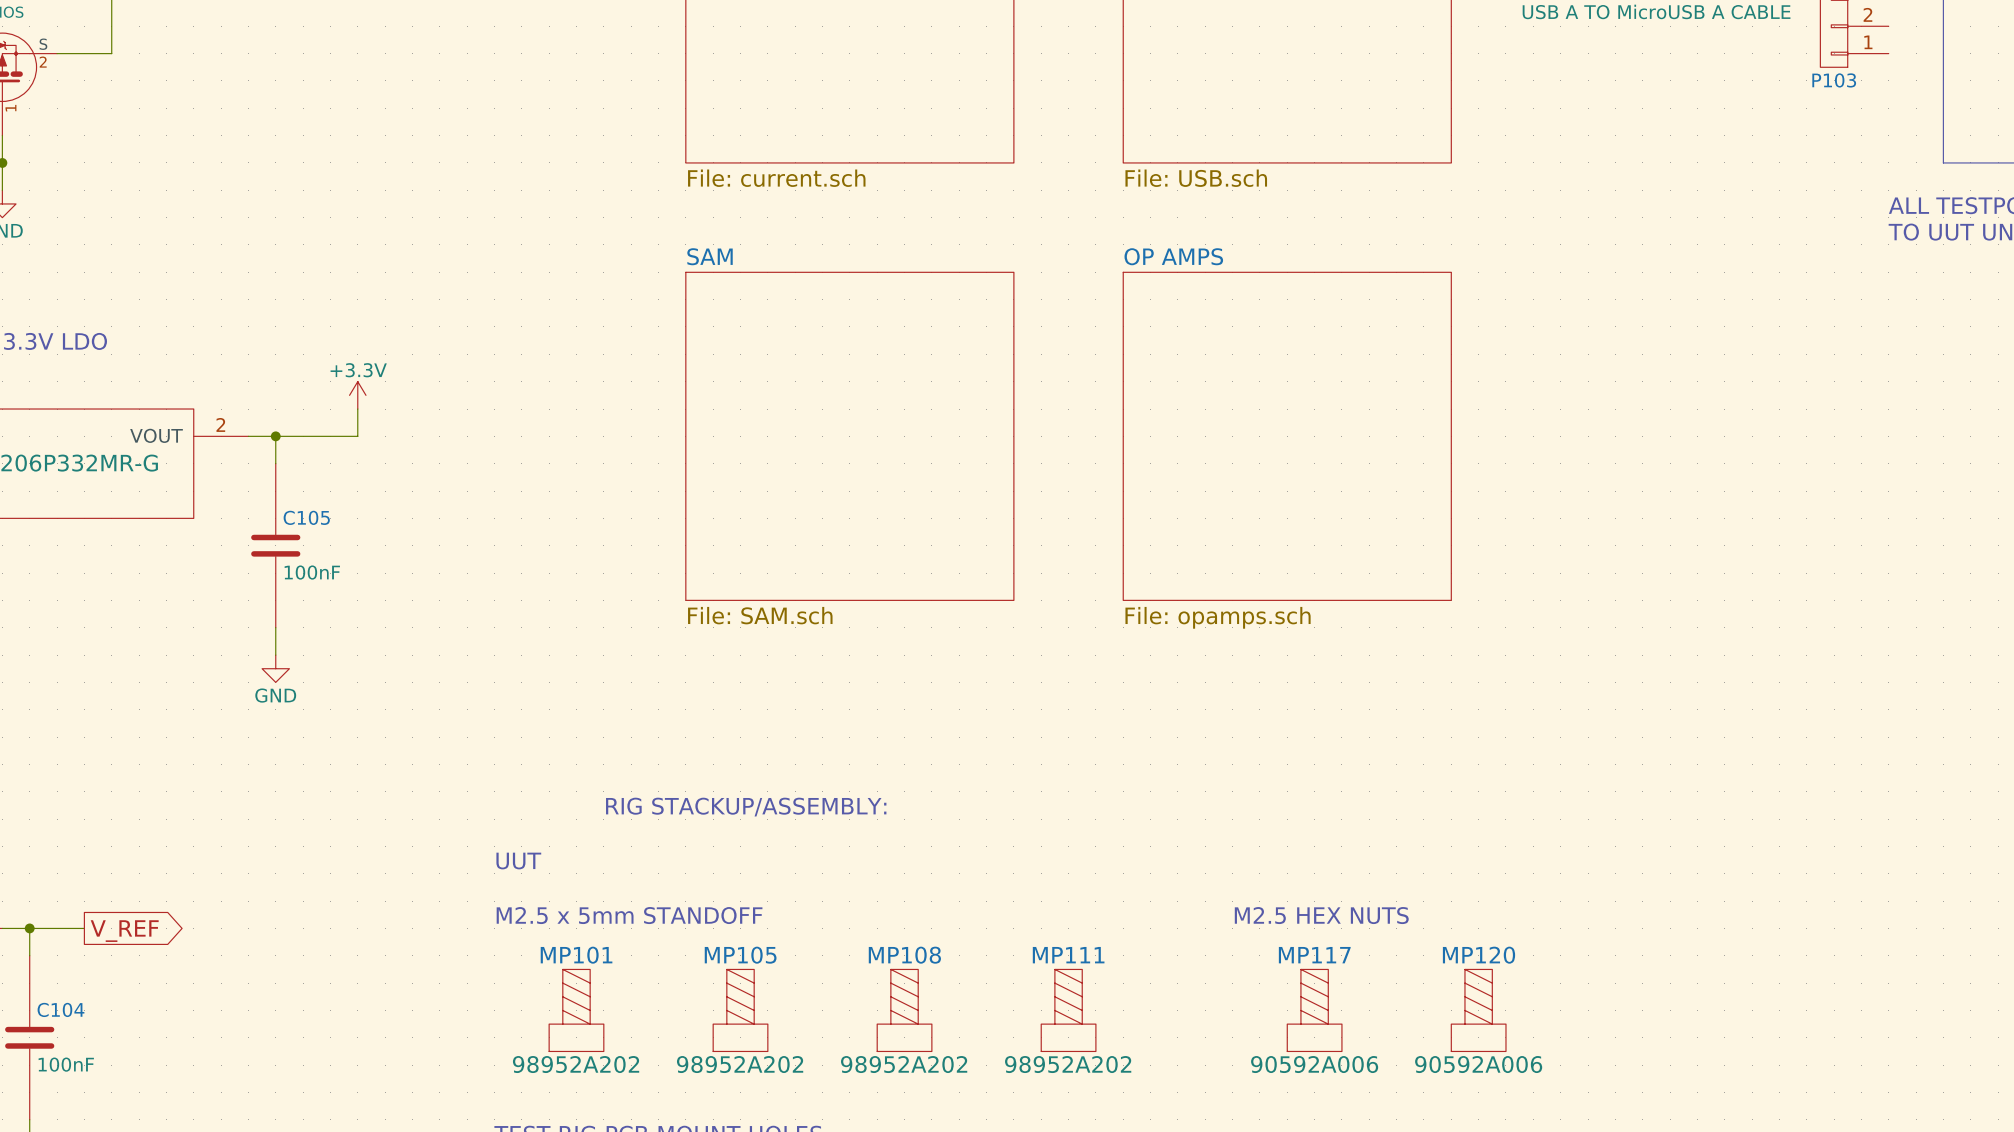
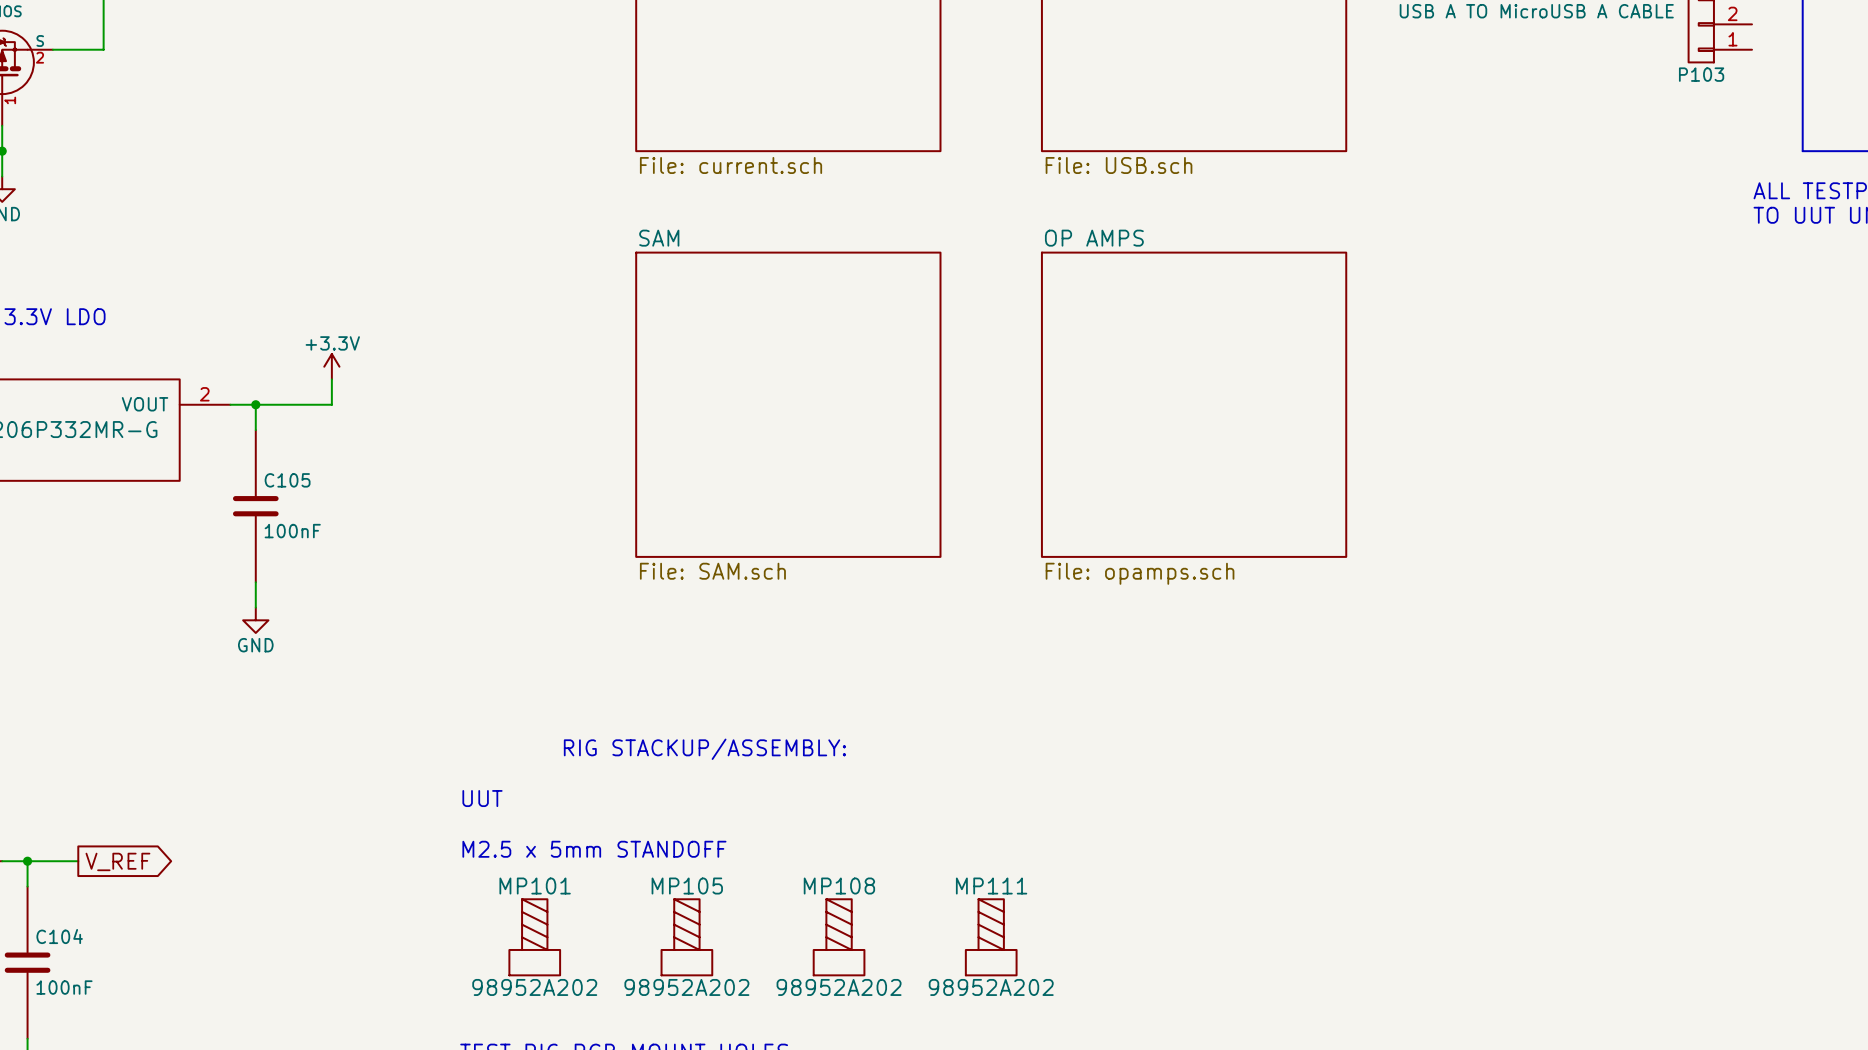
text: M2.5 HEX NUTS (1321, 915) -> none
MP117: 90592A006 (1314, 1010) -> none
MP120: 90592A006 (1478, 1010) -> none

